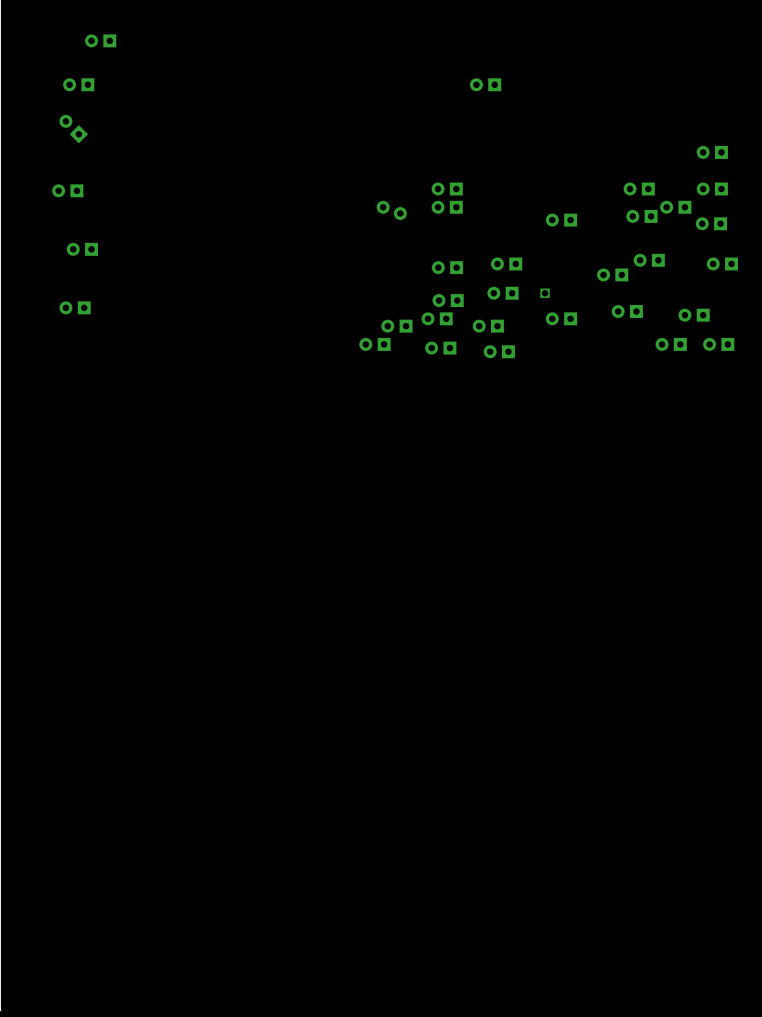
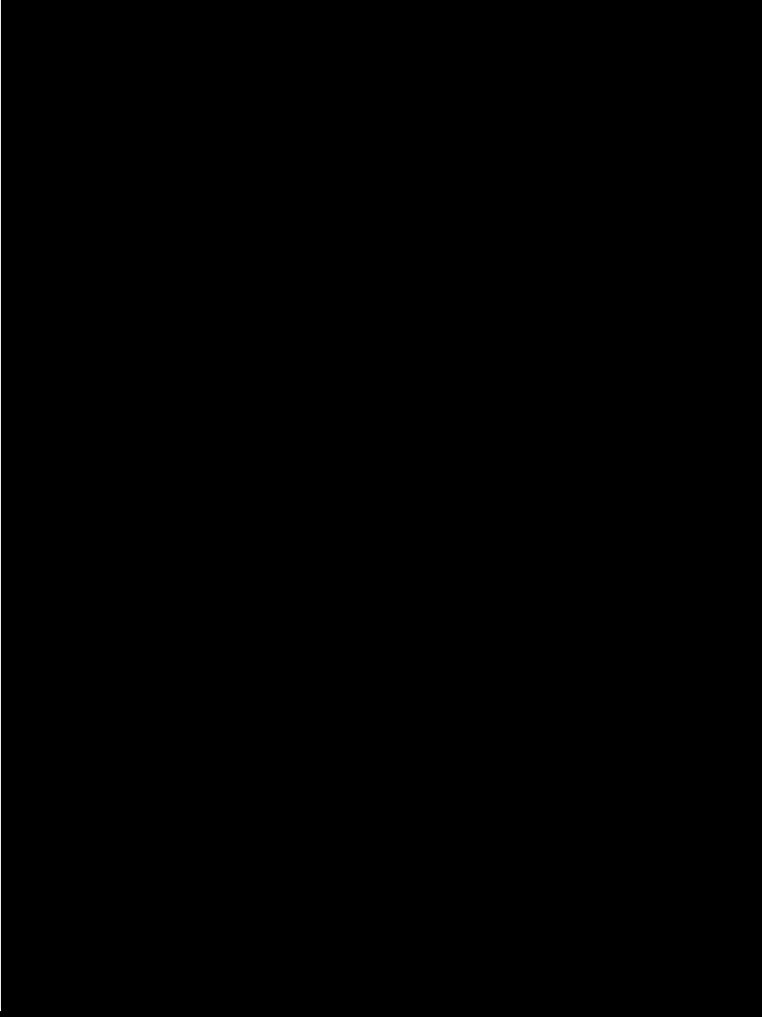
part: (100, 40) -> none
part: (78, 84) -> none
part: (485, 84) -> none
part: (73, 129) -> none
part: (712, 152) -> none
part: (447, 188) -> none
part: (639, 188) -> none
part: (712, 188) -> none
part: (67, 190) -> none
part: (447, 207) -> none
part: (675, 207) -> none
part: (391, 210) -> none
part: (641, 216) -> none
part: (561, 220) -> none
part: (711, 223) -> none
part: (82, 249) -> none
part: (649, 260) -> none
part: (506, 263) -> none
part: (722, 263) -> none
part: (447, 267) -> none
part: (612, 274) -> none
part: (502, 293) -> none
part: (545, 293) -> none
part: (448, 300) -> none
part: (75, 307) -> none
part: (627, 311) -> none
part: (694, 315) -> none
part: (437, 318) -> none
part: (561, 318) -> none
part: (396, 326) -> none
part: (488, 326) -> none
part: (374, 344) -> none
part: (671, 344) -> none
part: (718, 344) -> none
part: (440, 348) -> none
part: (499, 351) -> none

